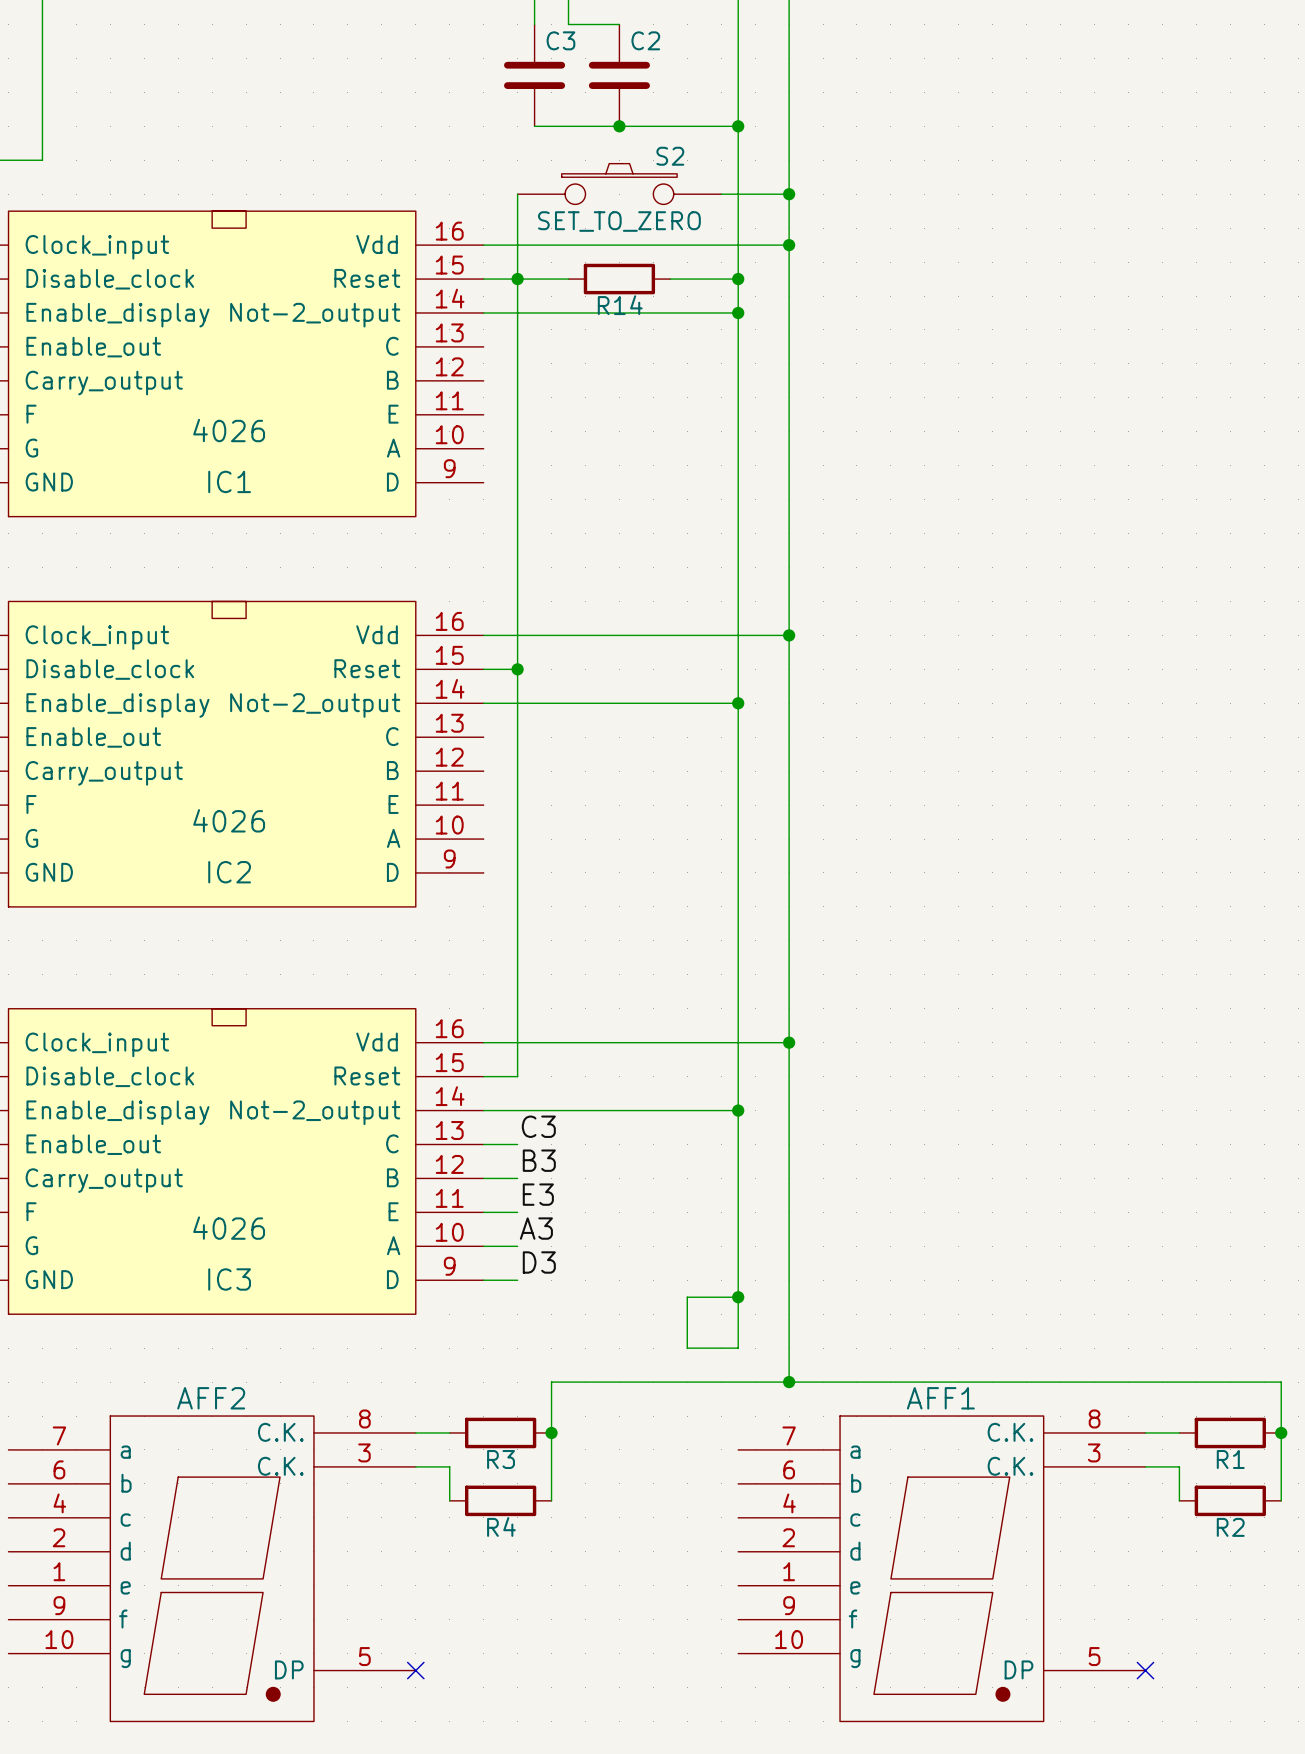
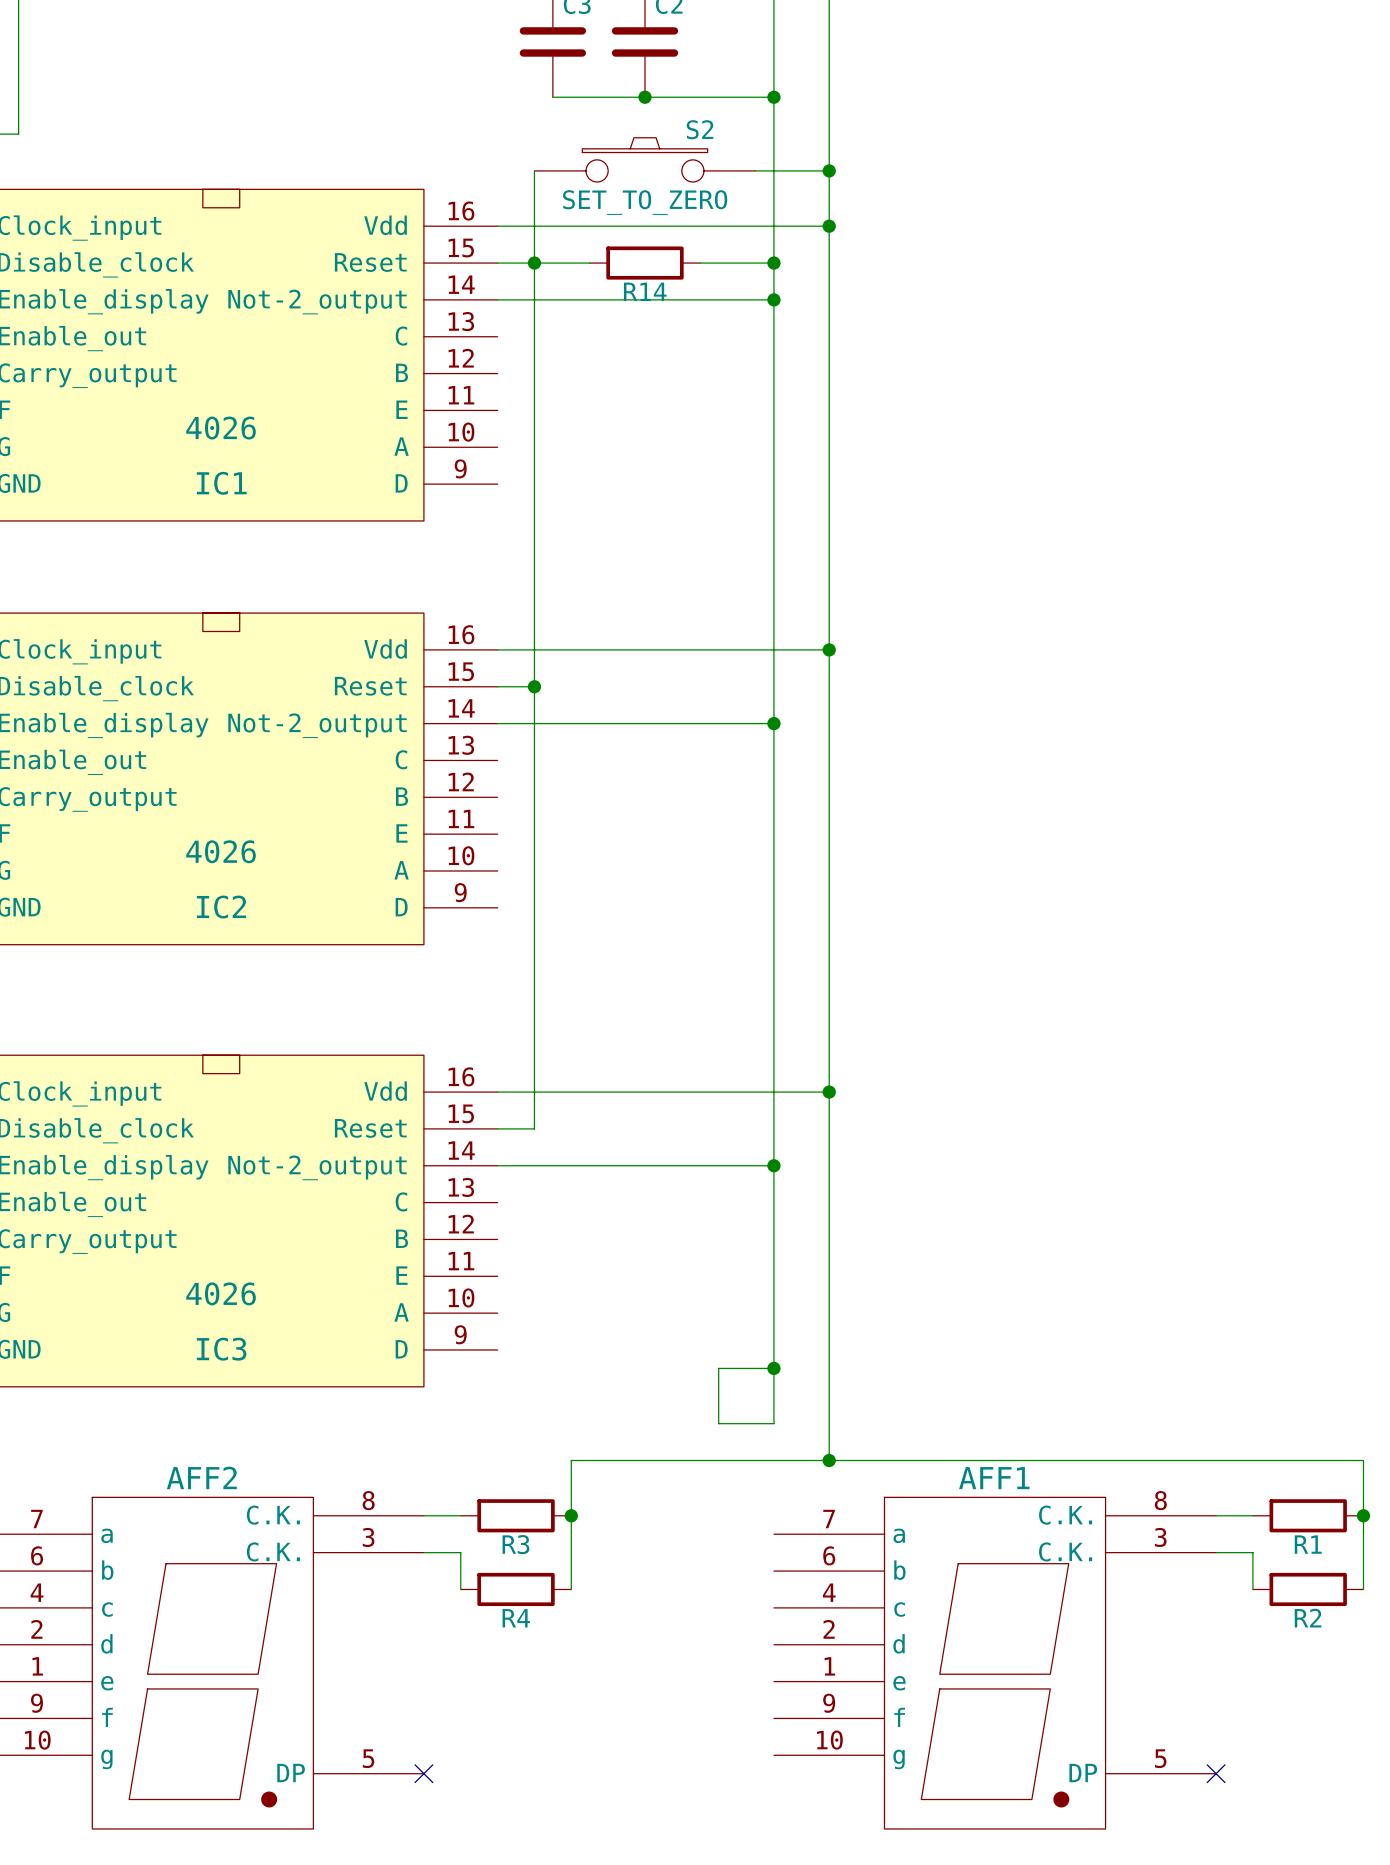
label: C3 (538, 1126) -> none
wire: (483, 1144) (517, 1144) -> none
label: B3 (539, 1160) -> none
wire: (483, 1178) (517, 1178) -> none
label: E3 (538, 1194) -> none
wire: (483, 1212) (517, 1212) -> none
label: A3 (536, 1228) -> none
wire: (483, 1246) (517, 1246) -> none
label: D3 (539, 1262) -> none
wire: (483, 1280) (517, 1280) -> none

